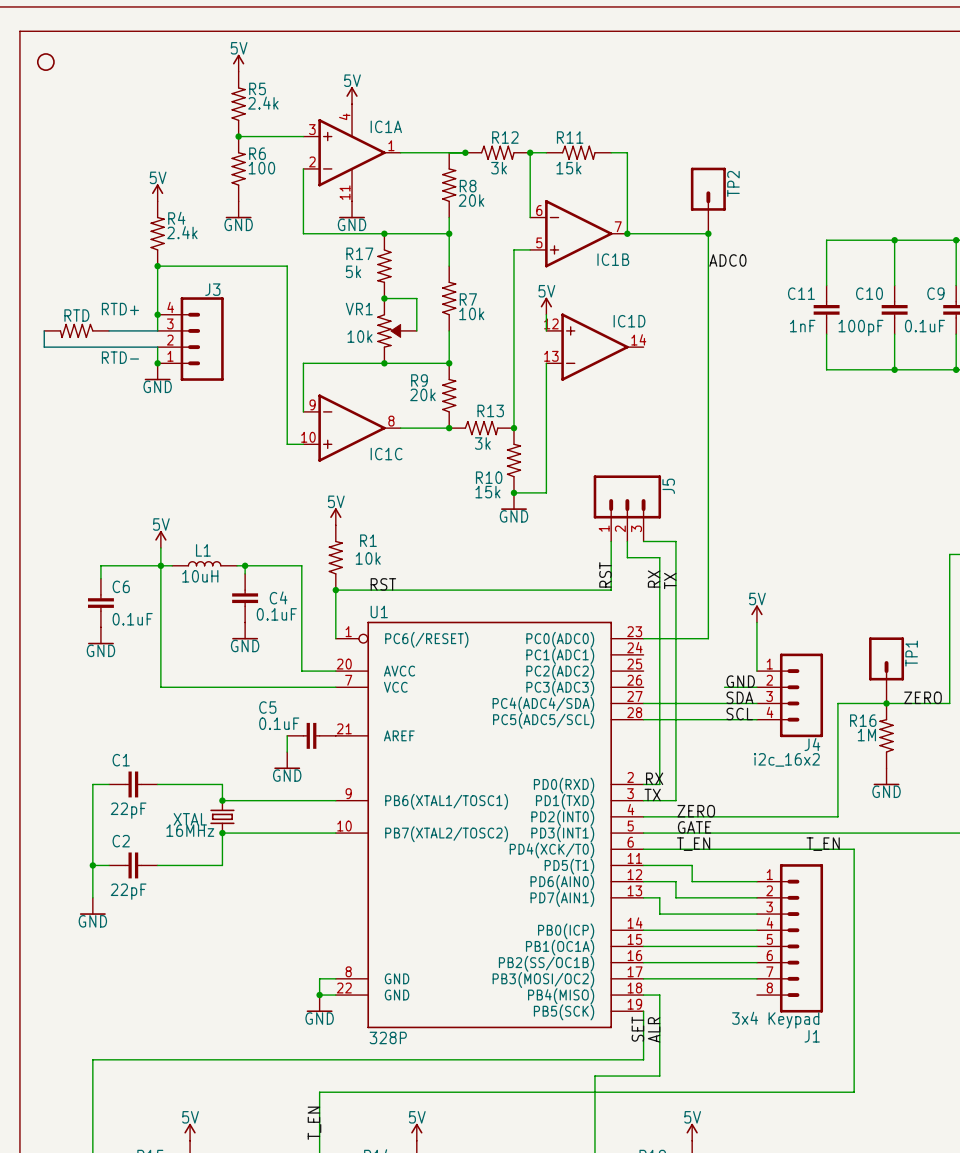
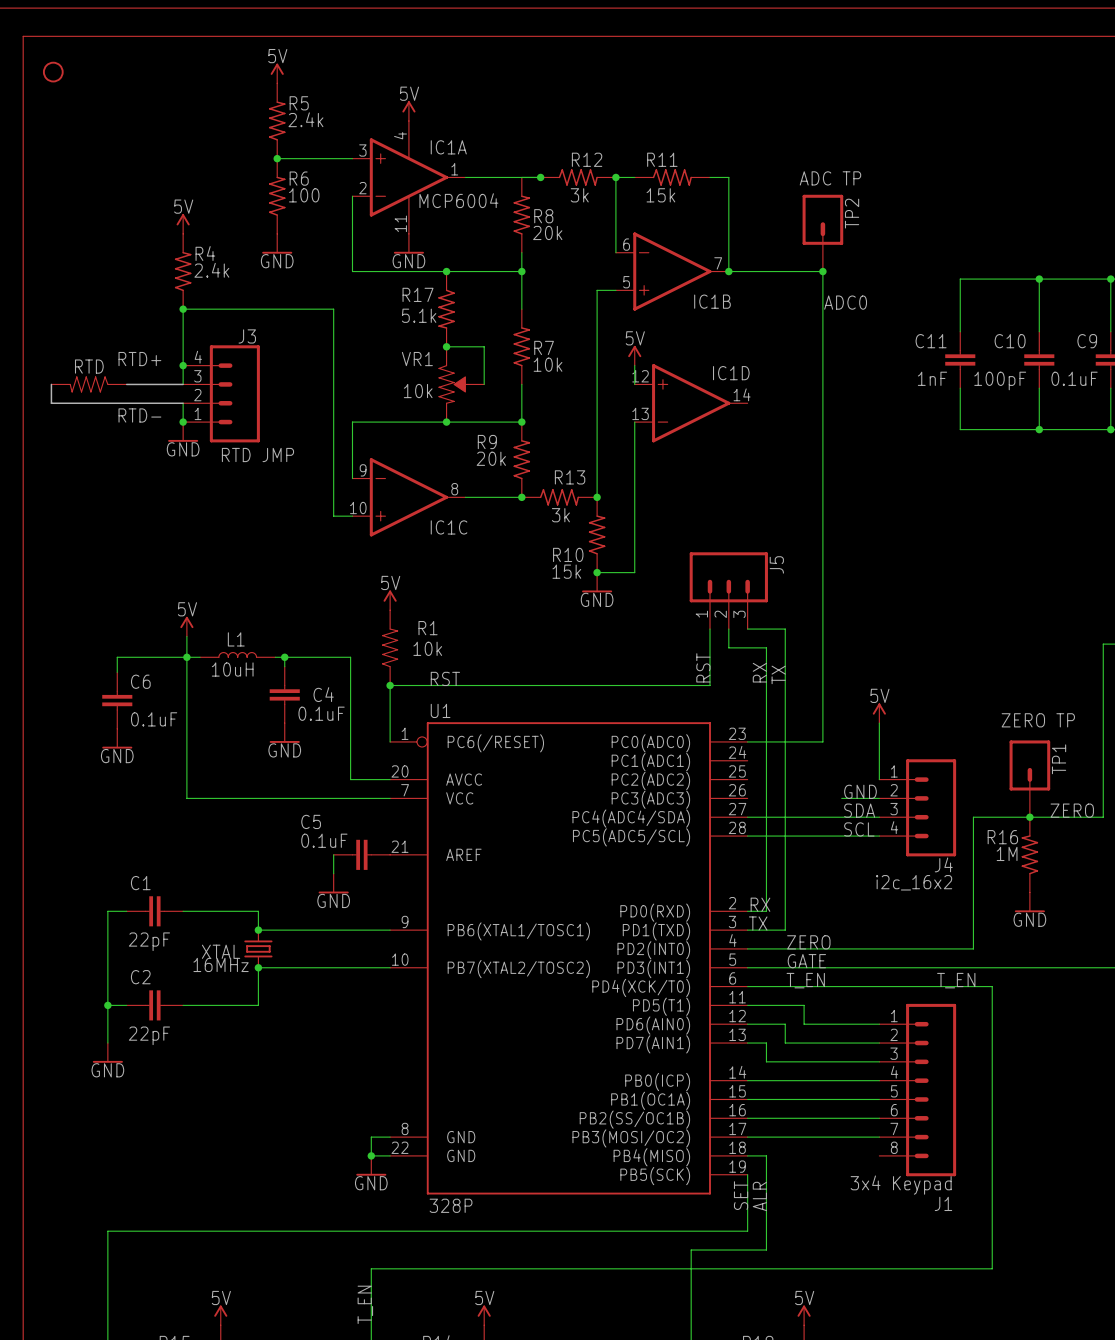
text: none -> ADC TP (830, 178)
text: none -> MCP6004 (458, 200)
R17 value: 5k (353, 271) -> 5.1k (419, 315)
text: none -> RTD JMP (257, 455)
text: none -> ZERO TP (1038, 720)

